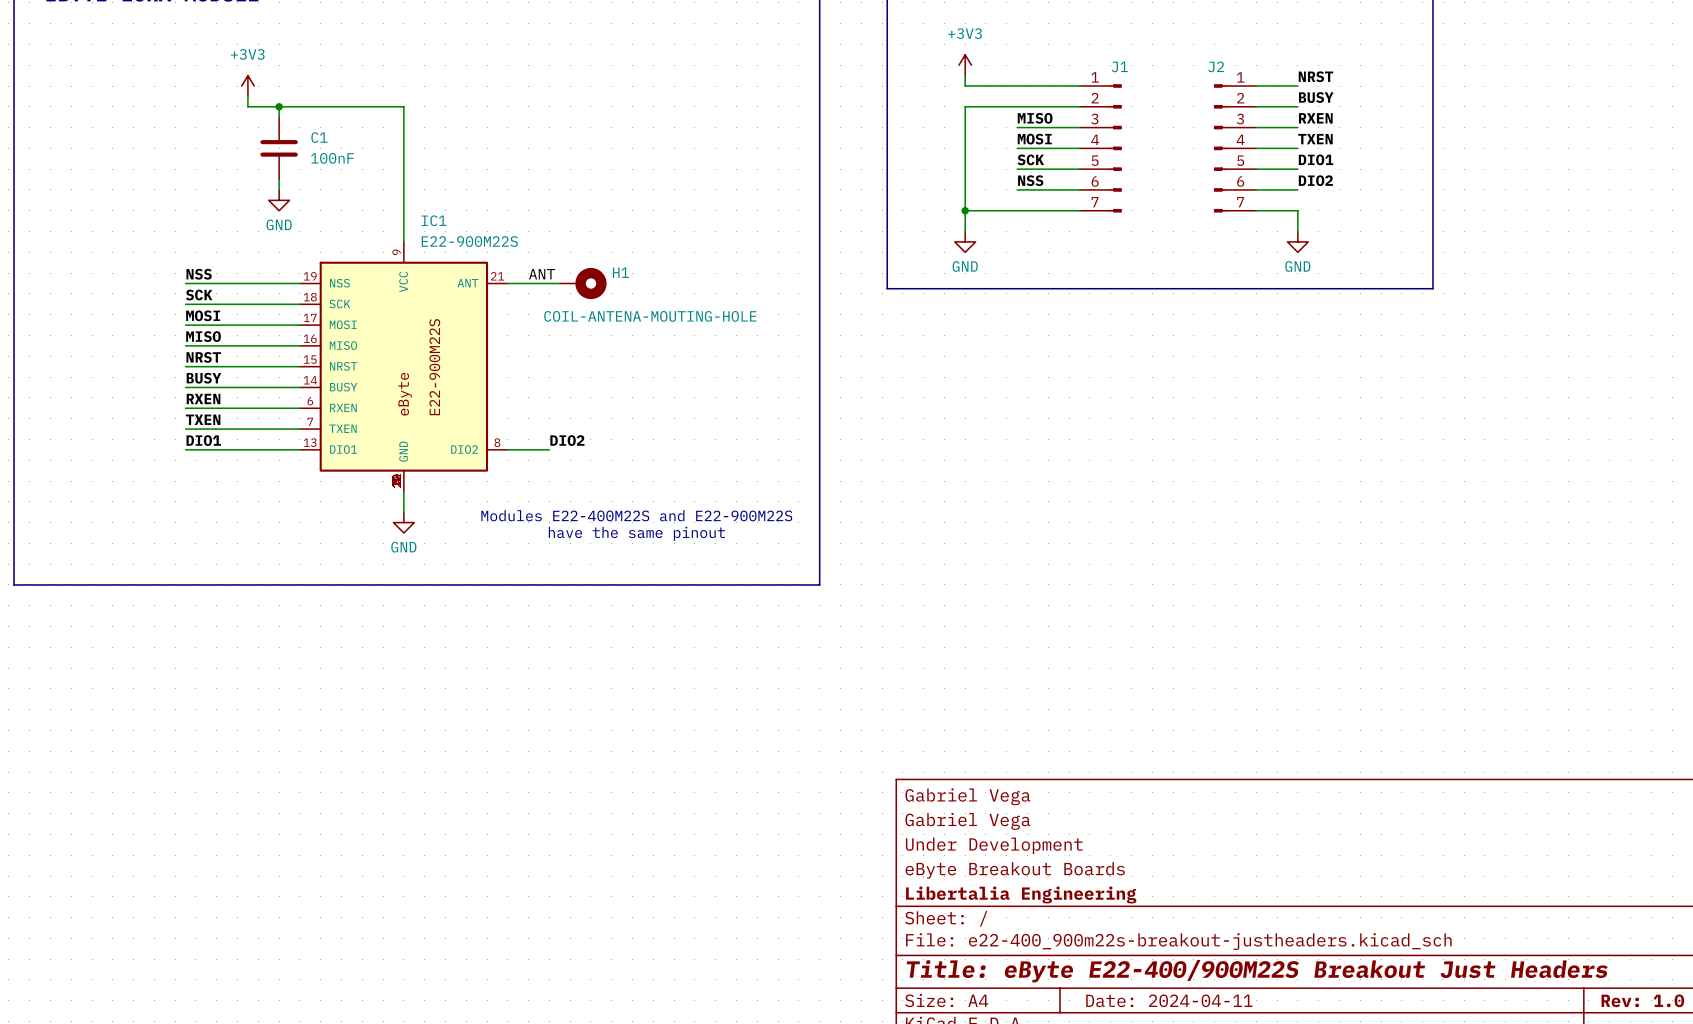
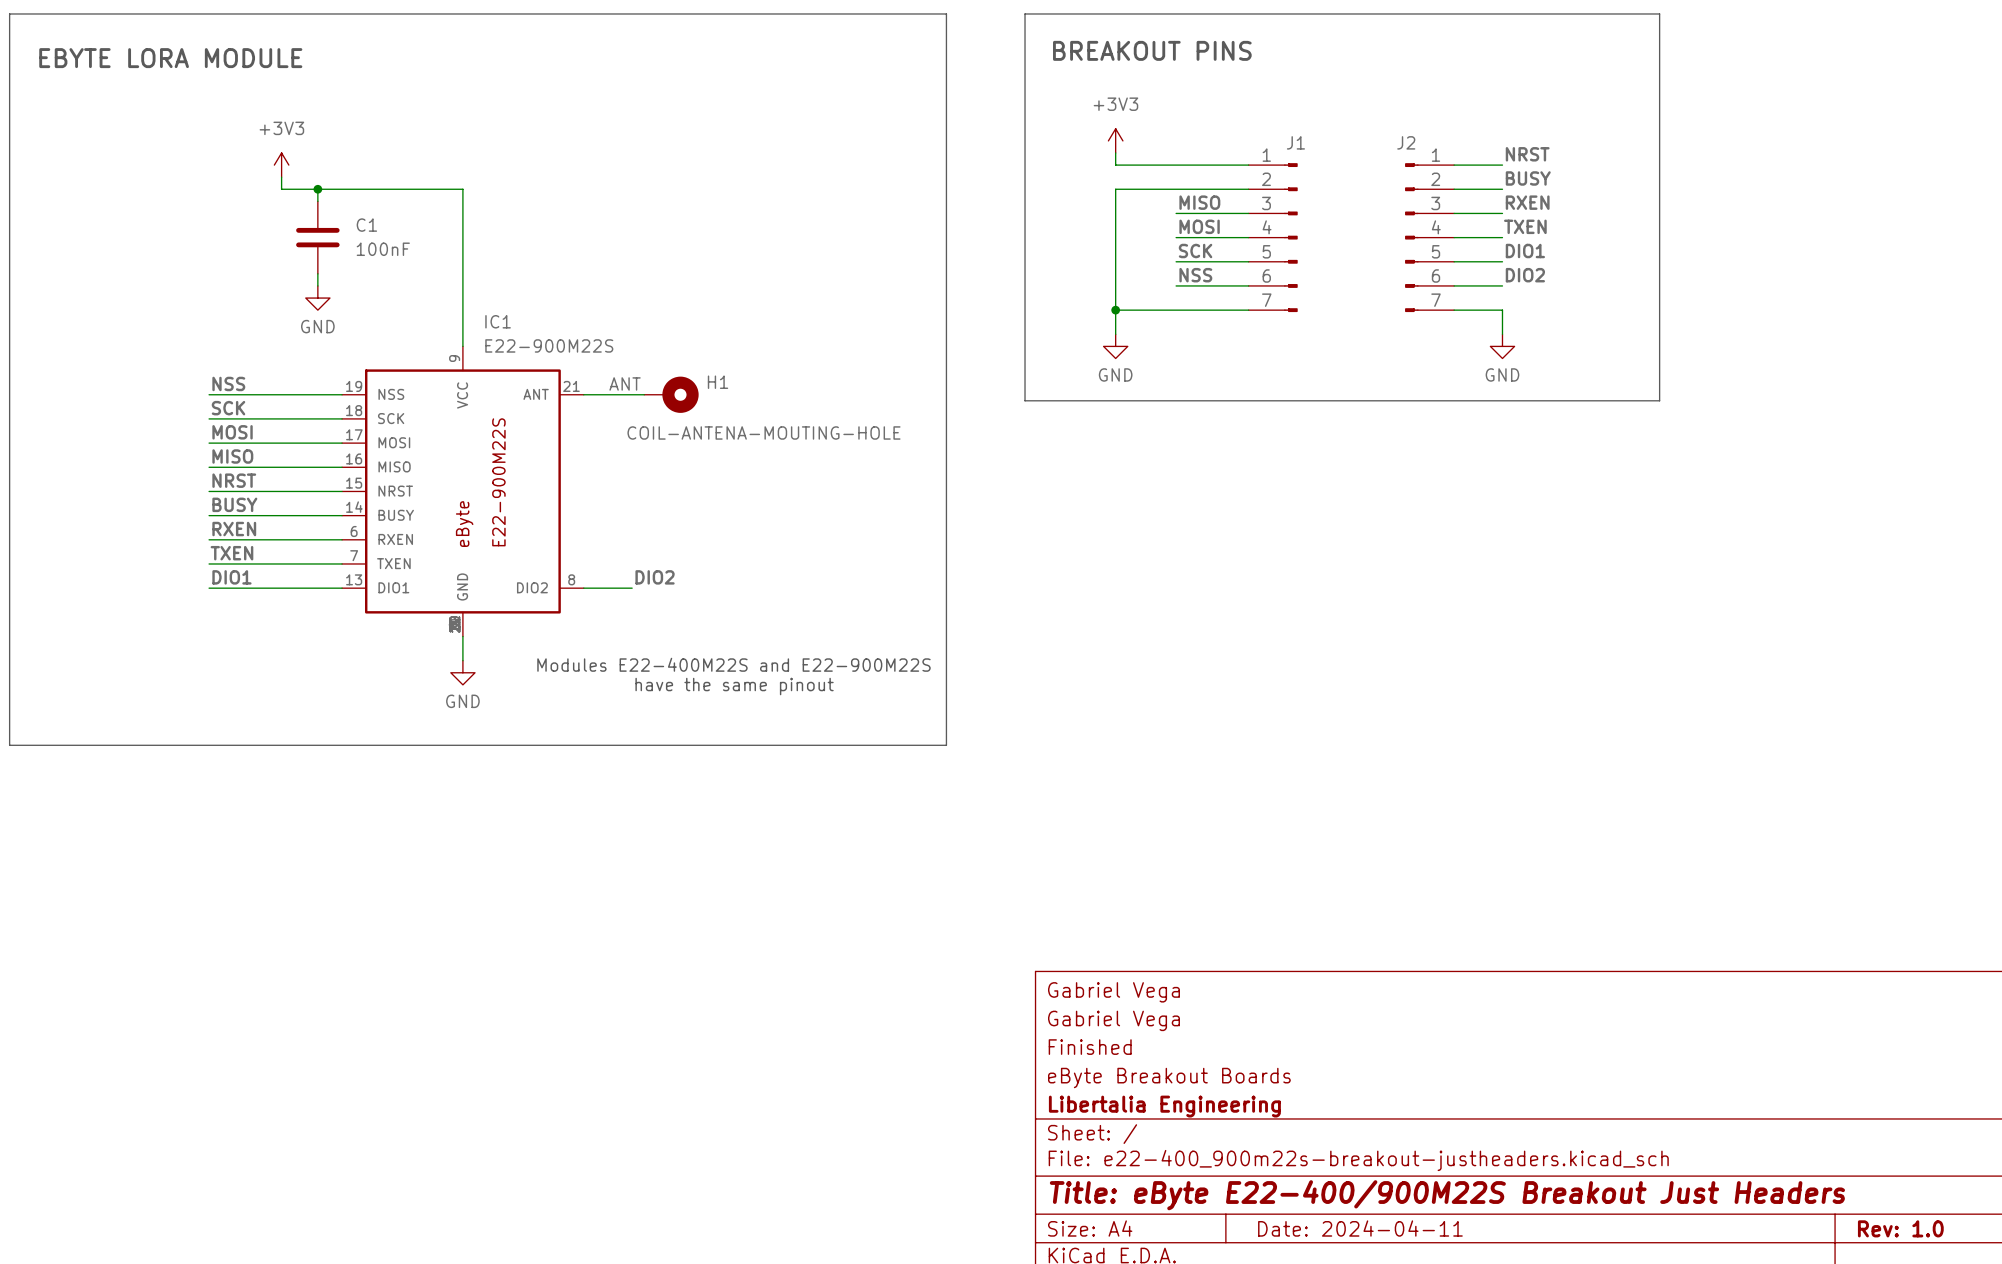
title block: Under Development (994, 845) -> Finished (1090, 1047)

